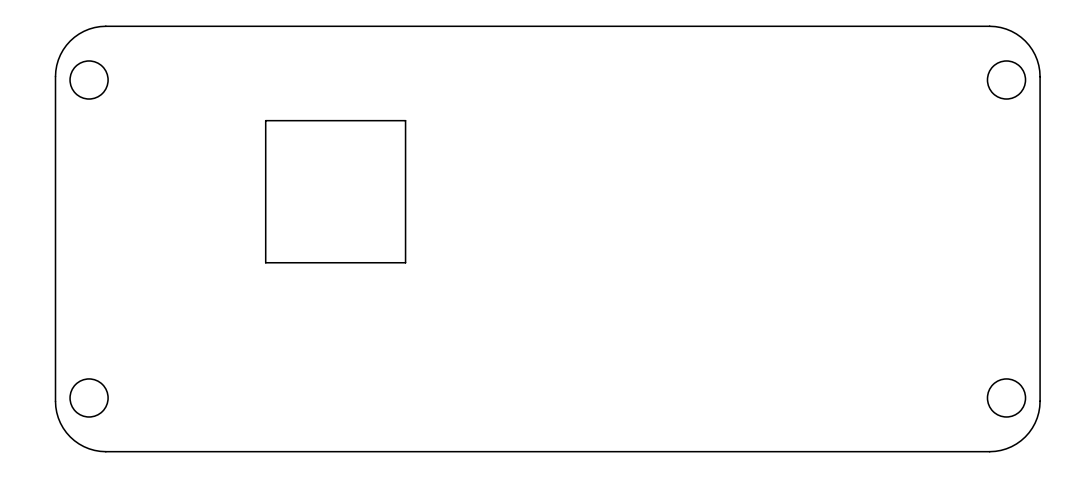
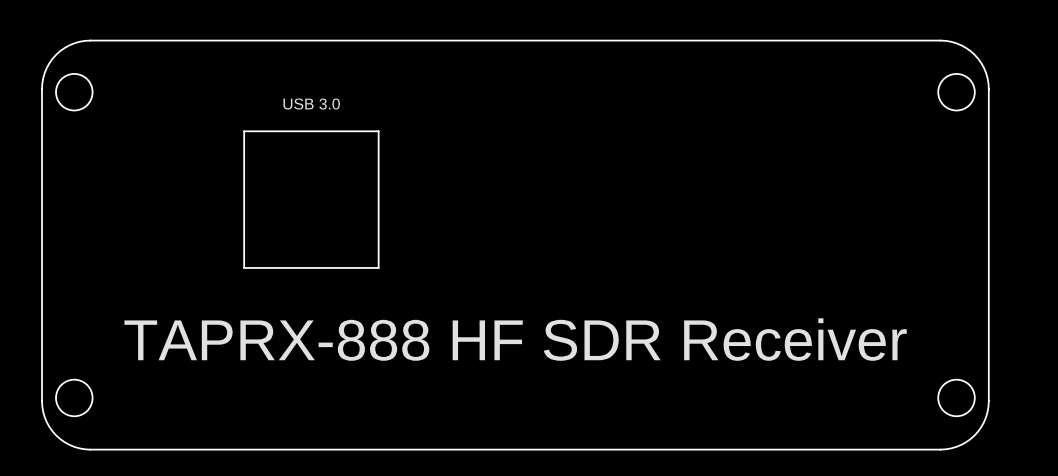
text: none -> USB 3.0 (311, 104)
text: none -> TAPRX-888 HF SDR Receiver (515, 339)

